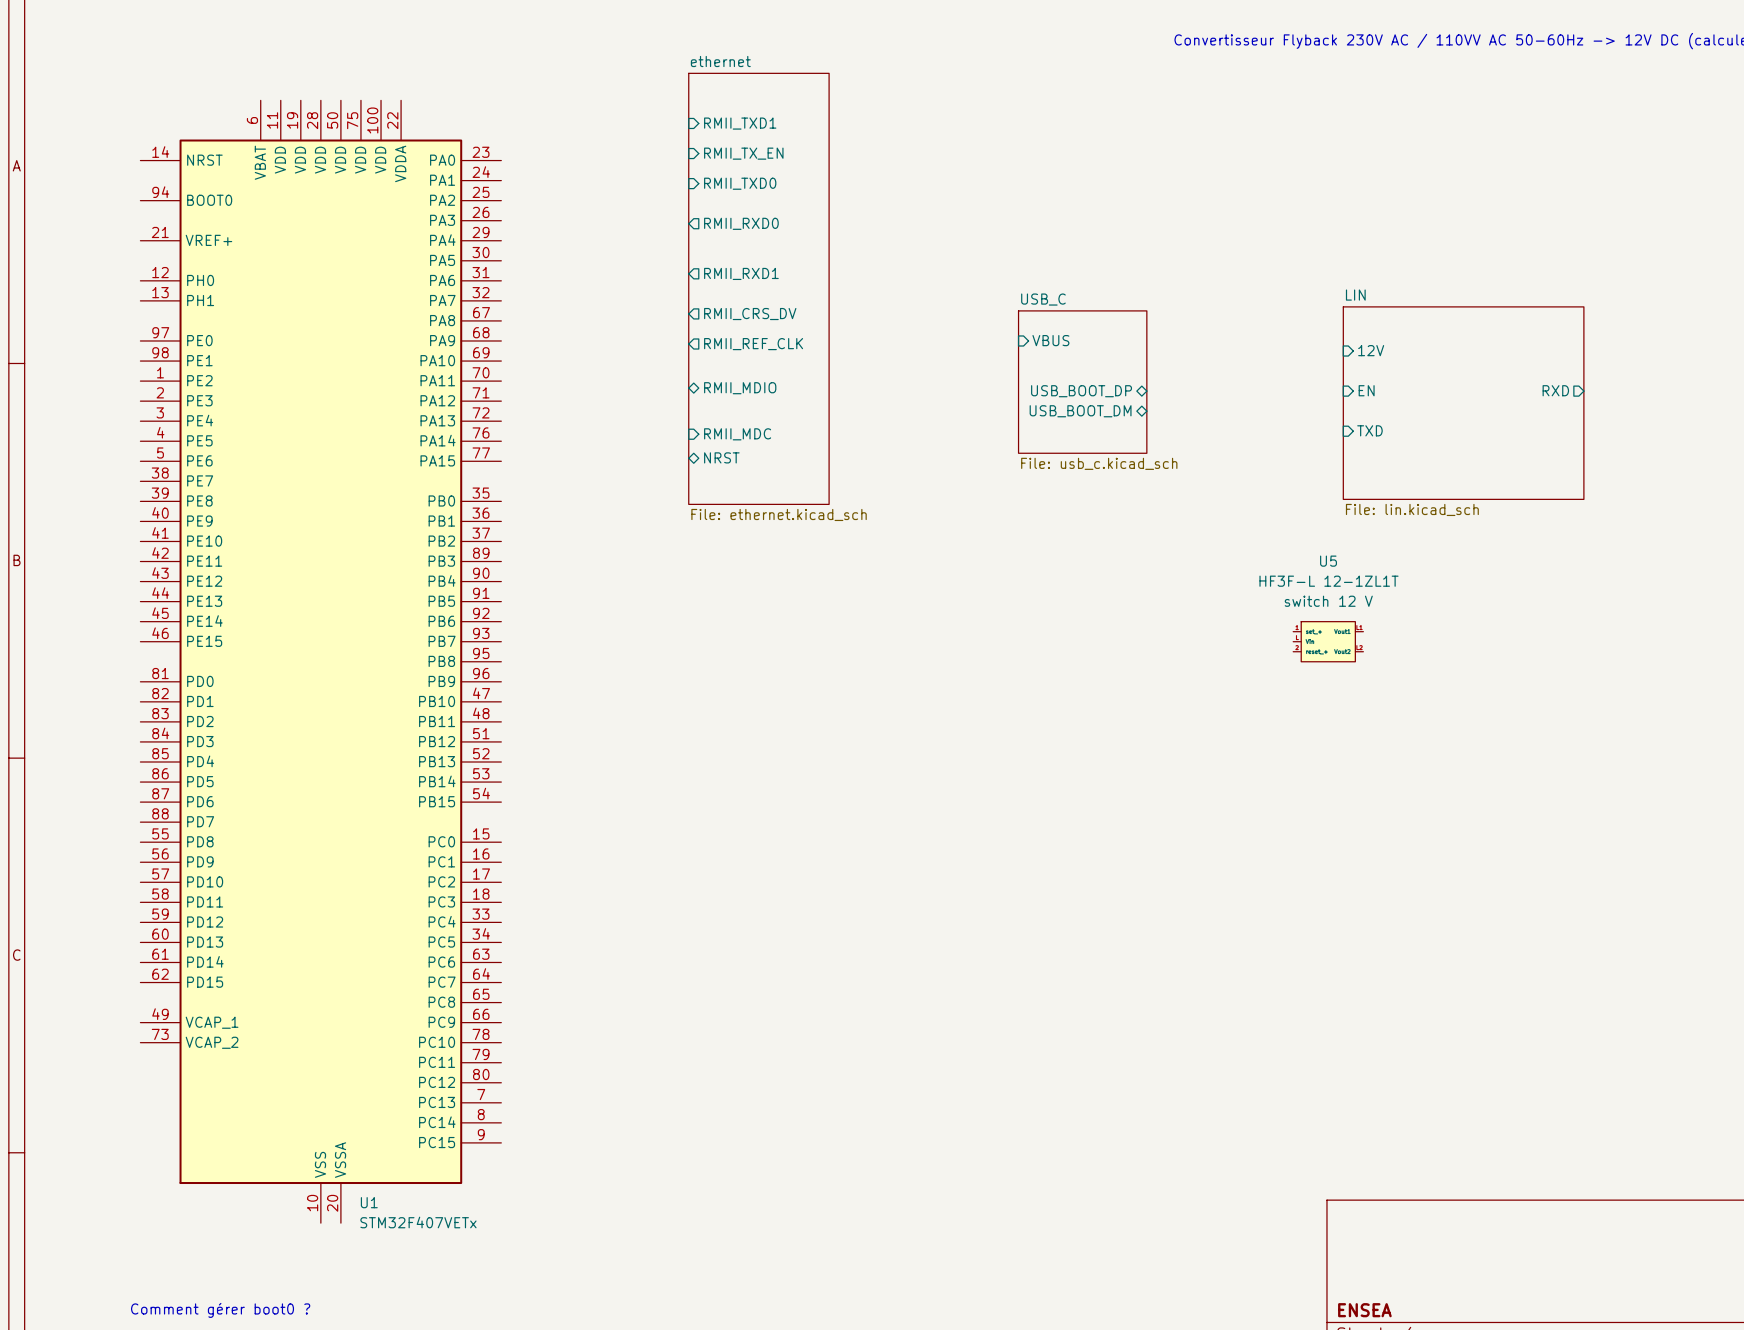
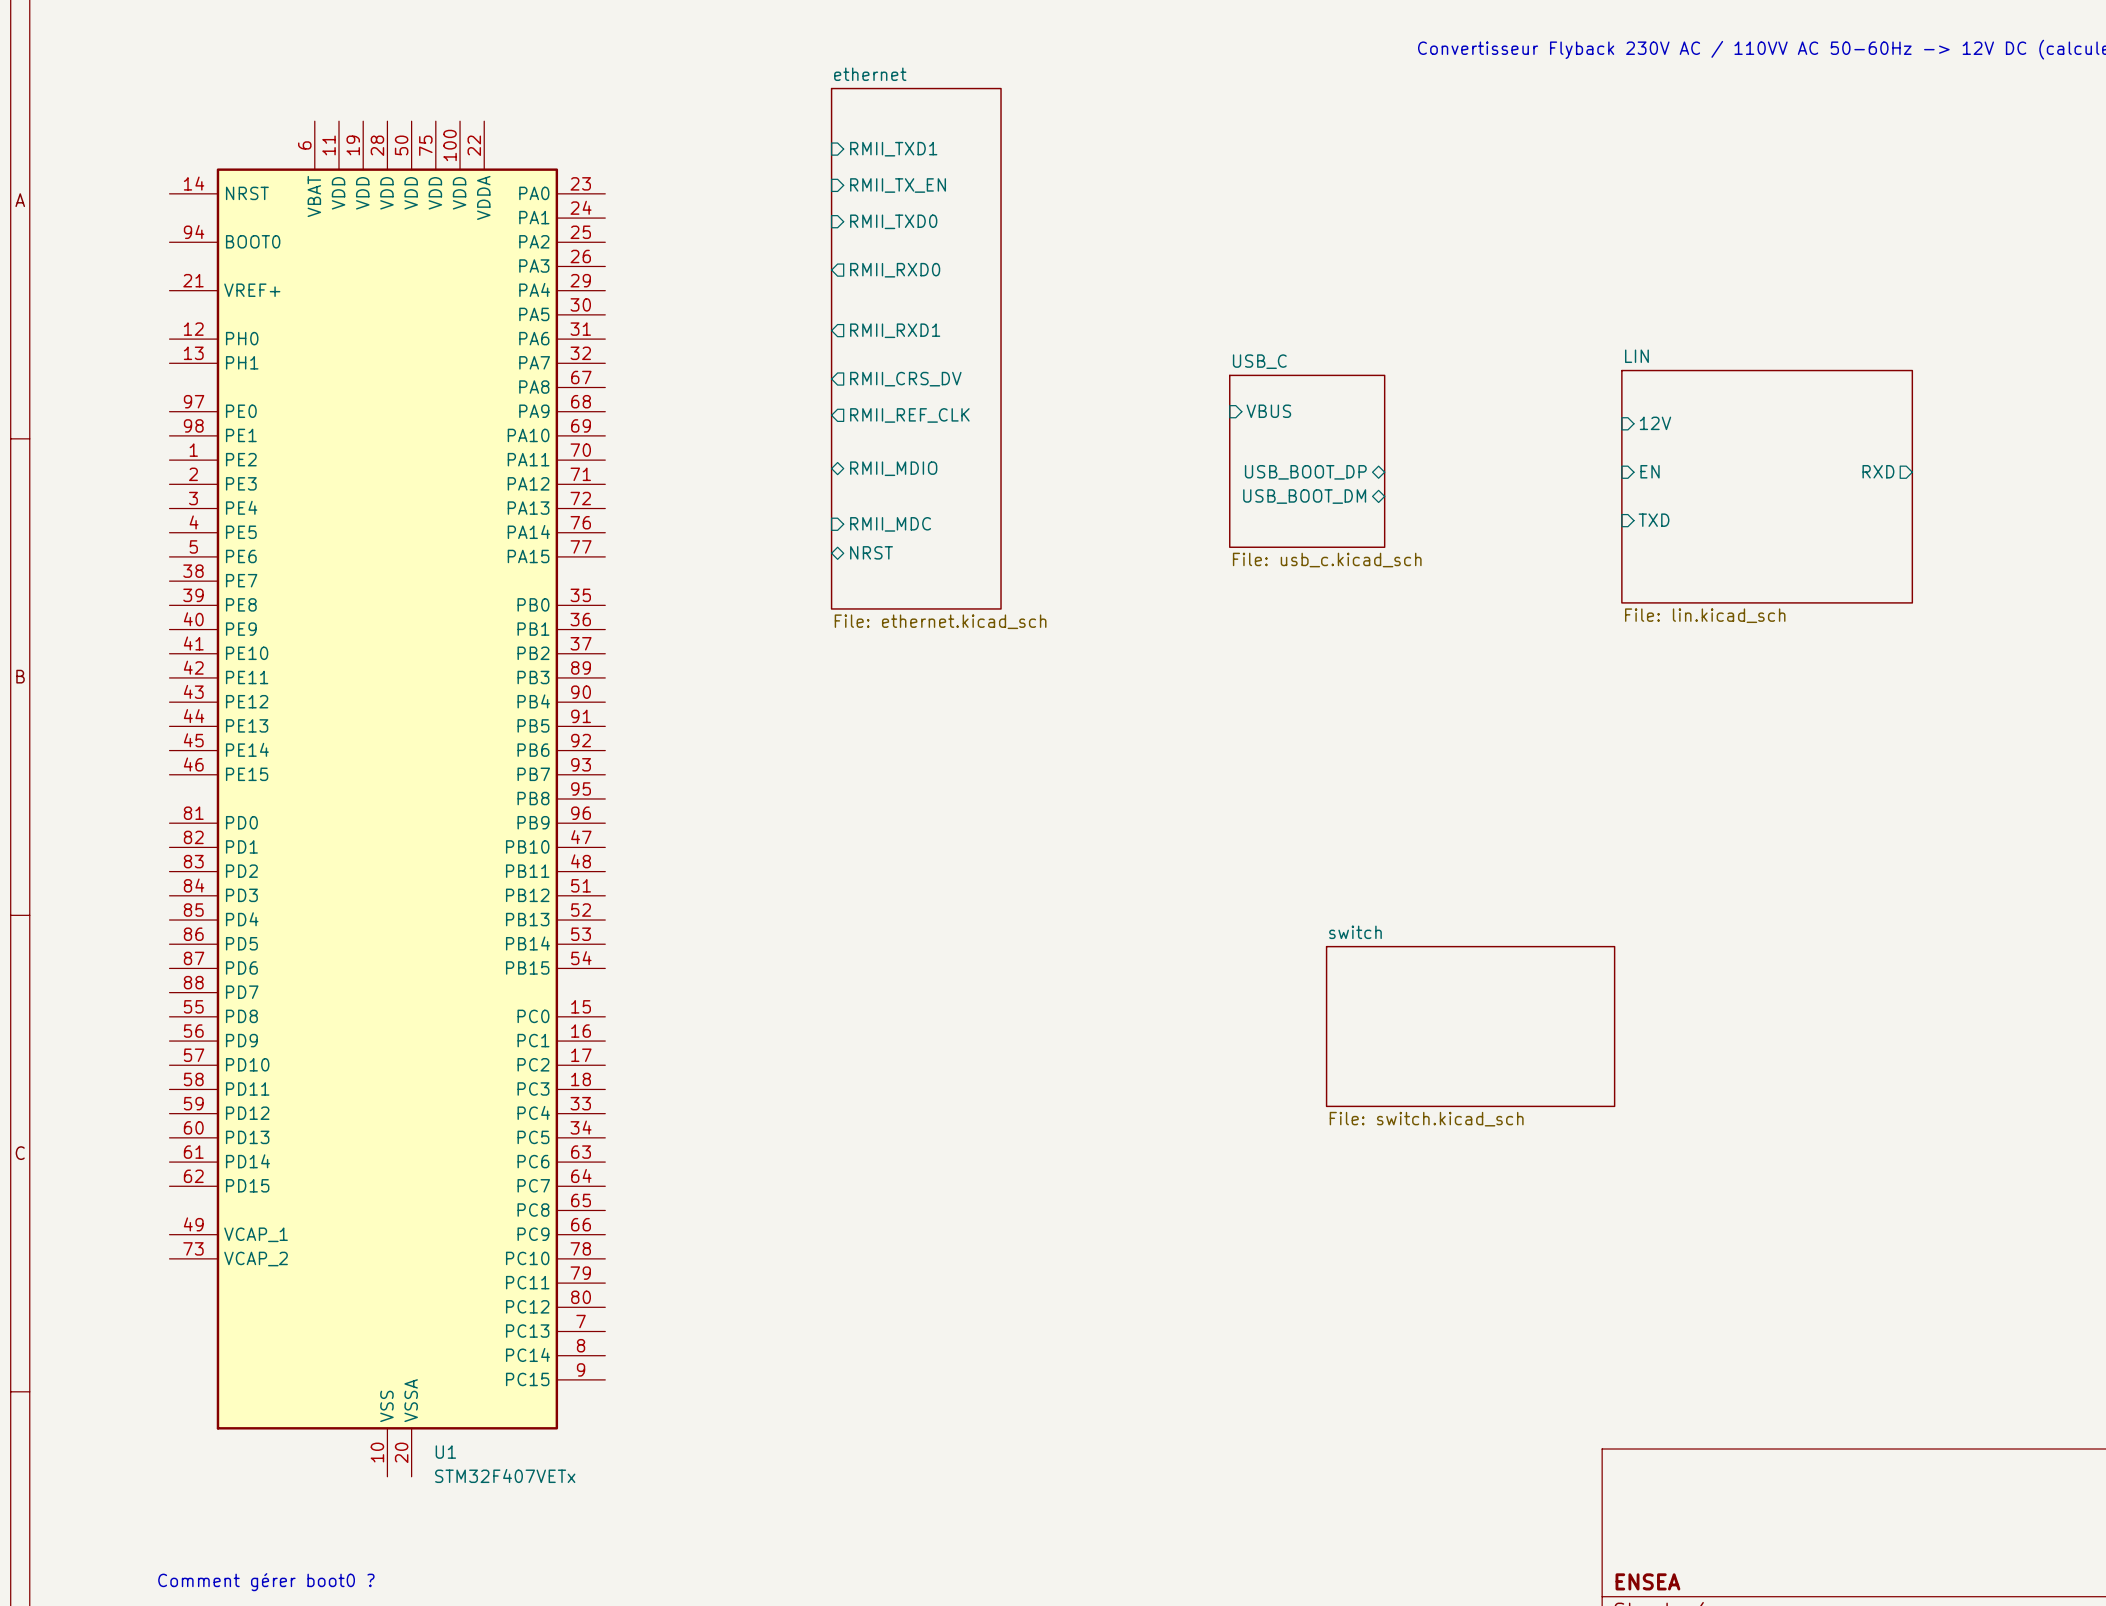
U5: HF3F-L 12-1ZL1T (1328, 641) -> none
sheet switch: none -> File: switch.kicad_sch (1470, 1026)

